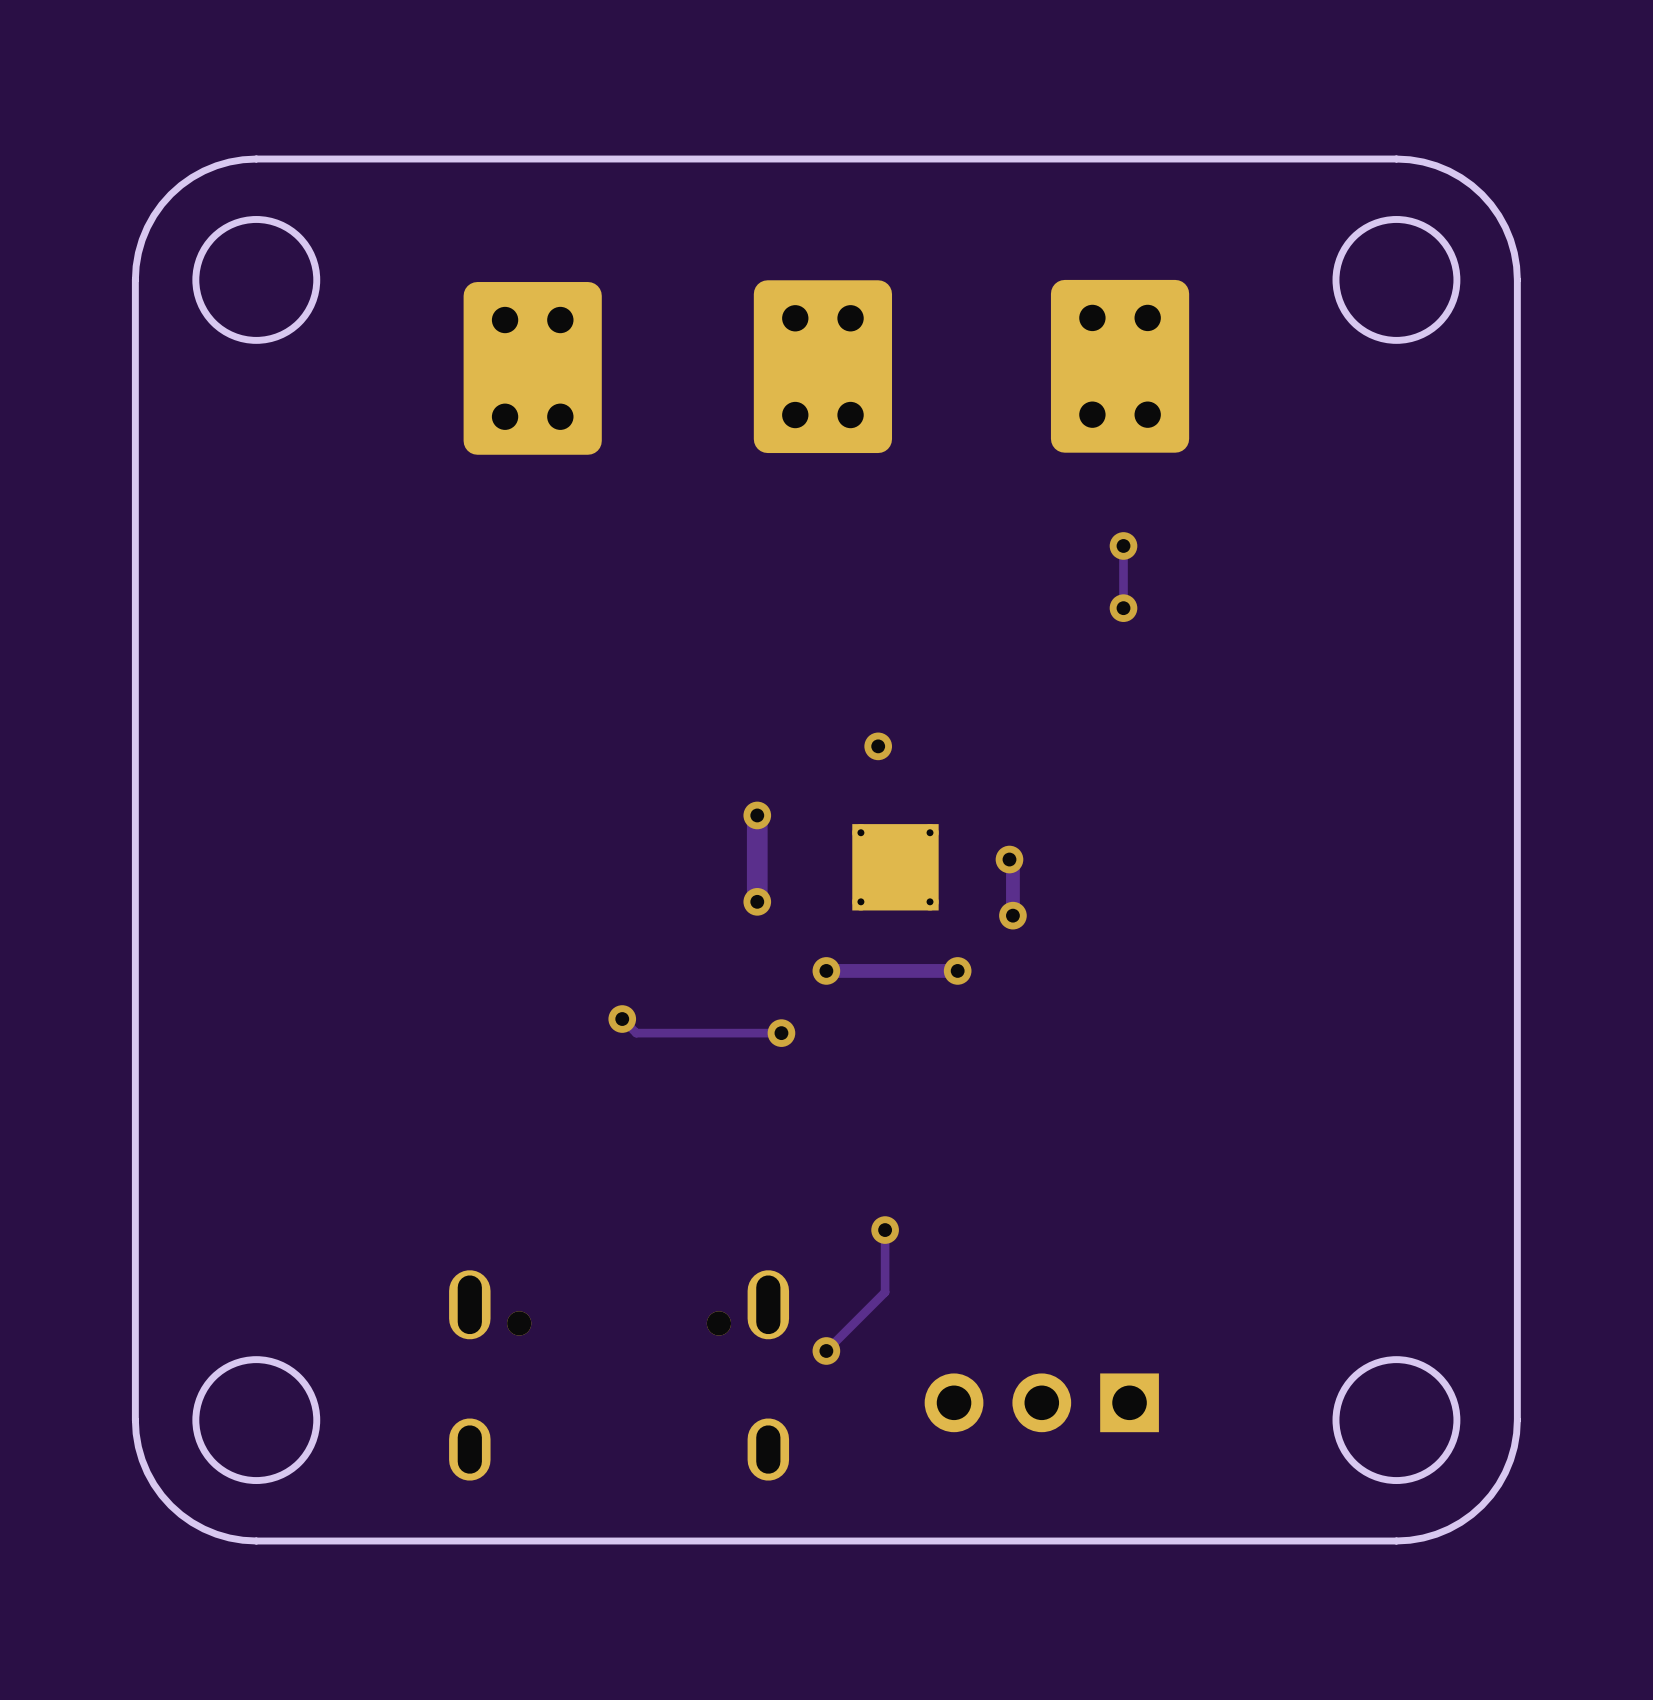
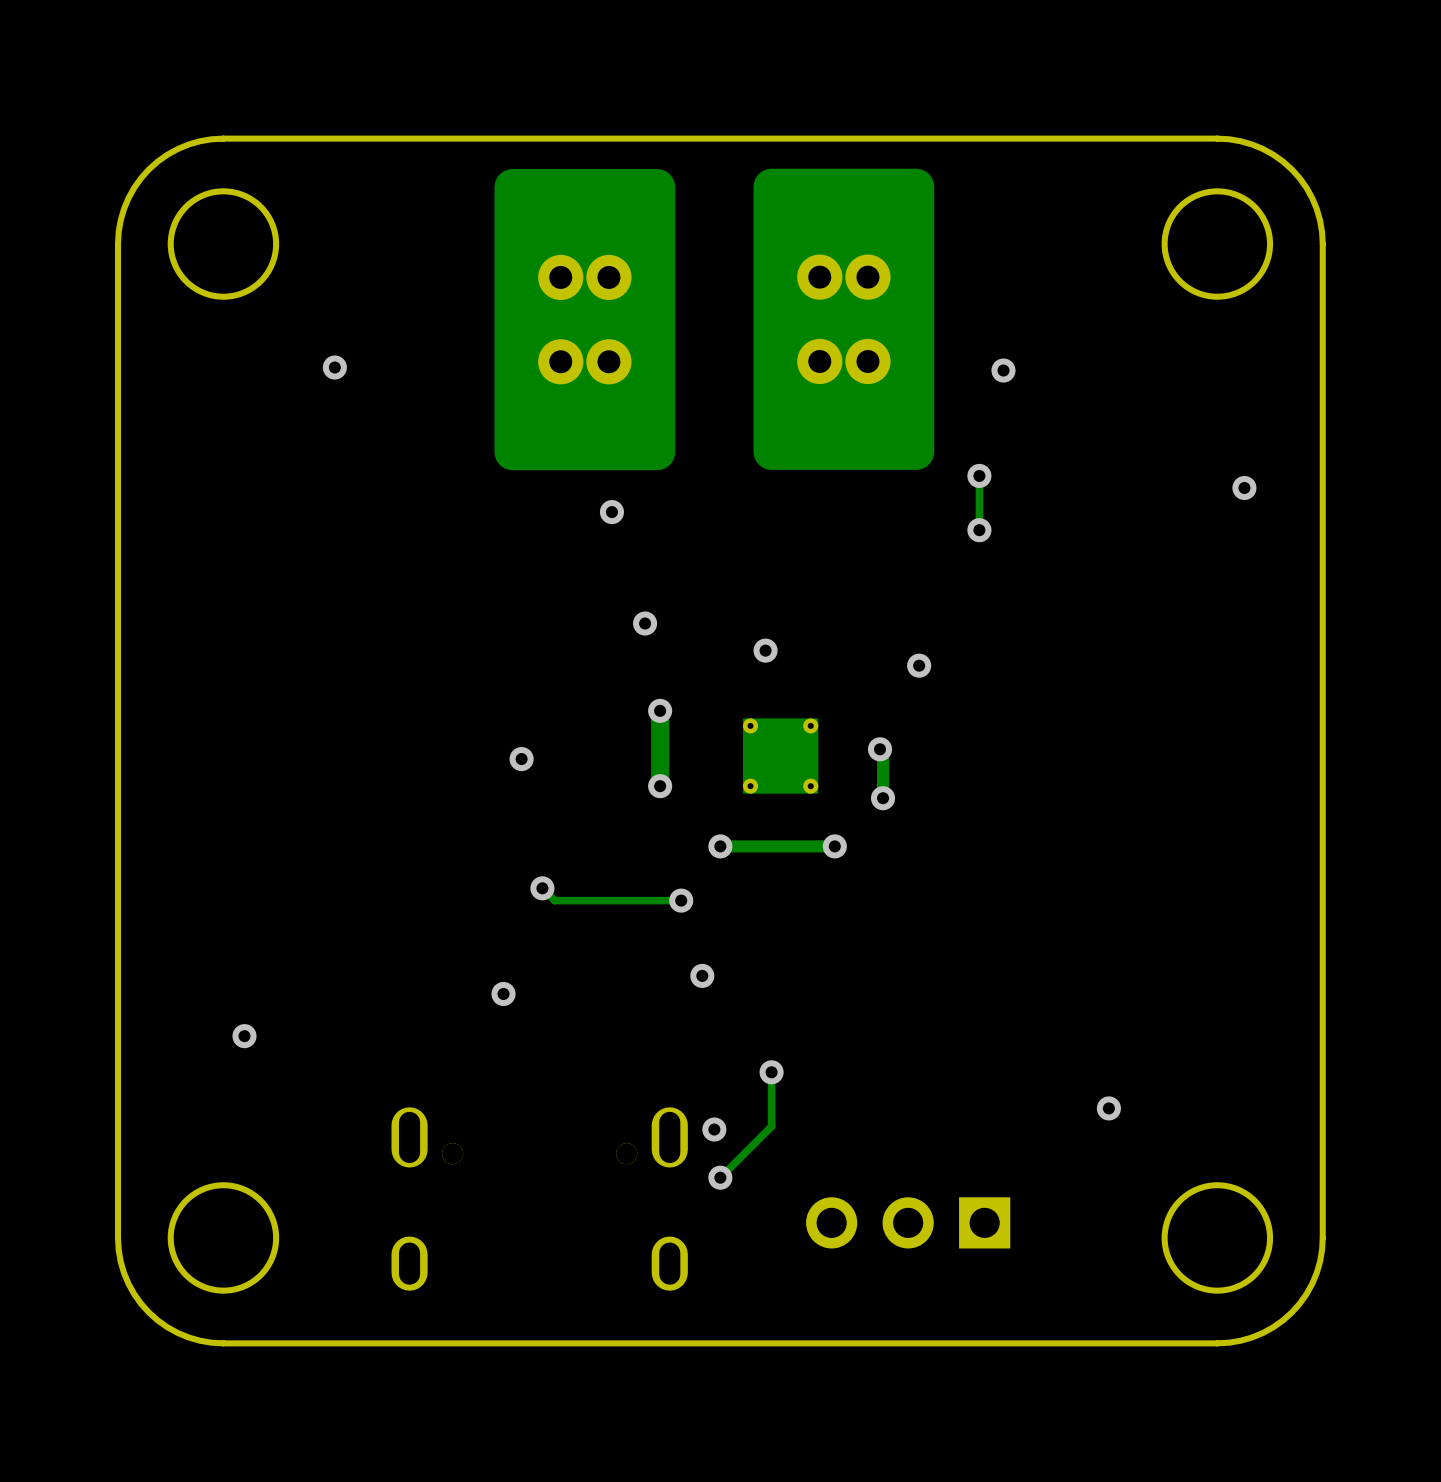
part: none -> (584, 319)
part: (822, 366) -> none
part: none -> (843, 319)
part: (1120, 366) -> none
part: (532, 368) -> none
via: none -> (334, 367)
via: none -> (1003, 370)
via: none -> (1244, 487)
via: none -> (611, 512)
via: none -> (645, 623)
via: none -> (919, 665)
via: none -> (521, 759)
via: none -> (702, 975)
via: none -> (503, 993)
via: none -> (244, 1036)
via: none -> (1108, 1108)
via: none -> (714, 1129)

